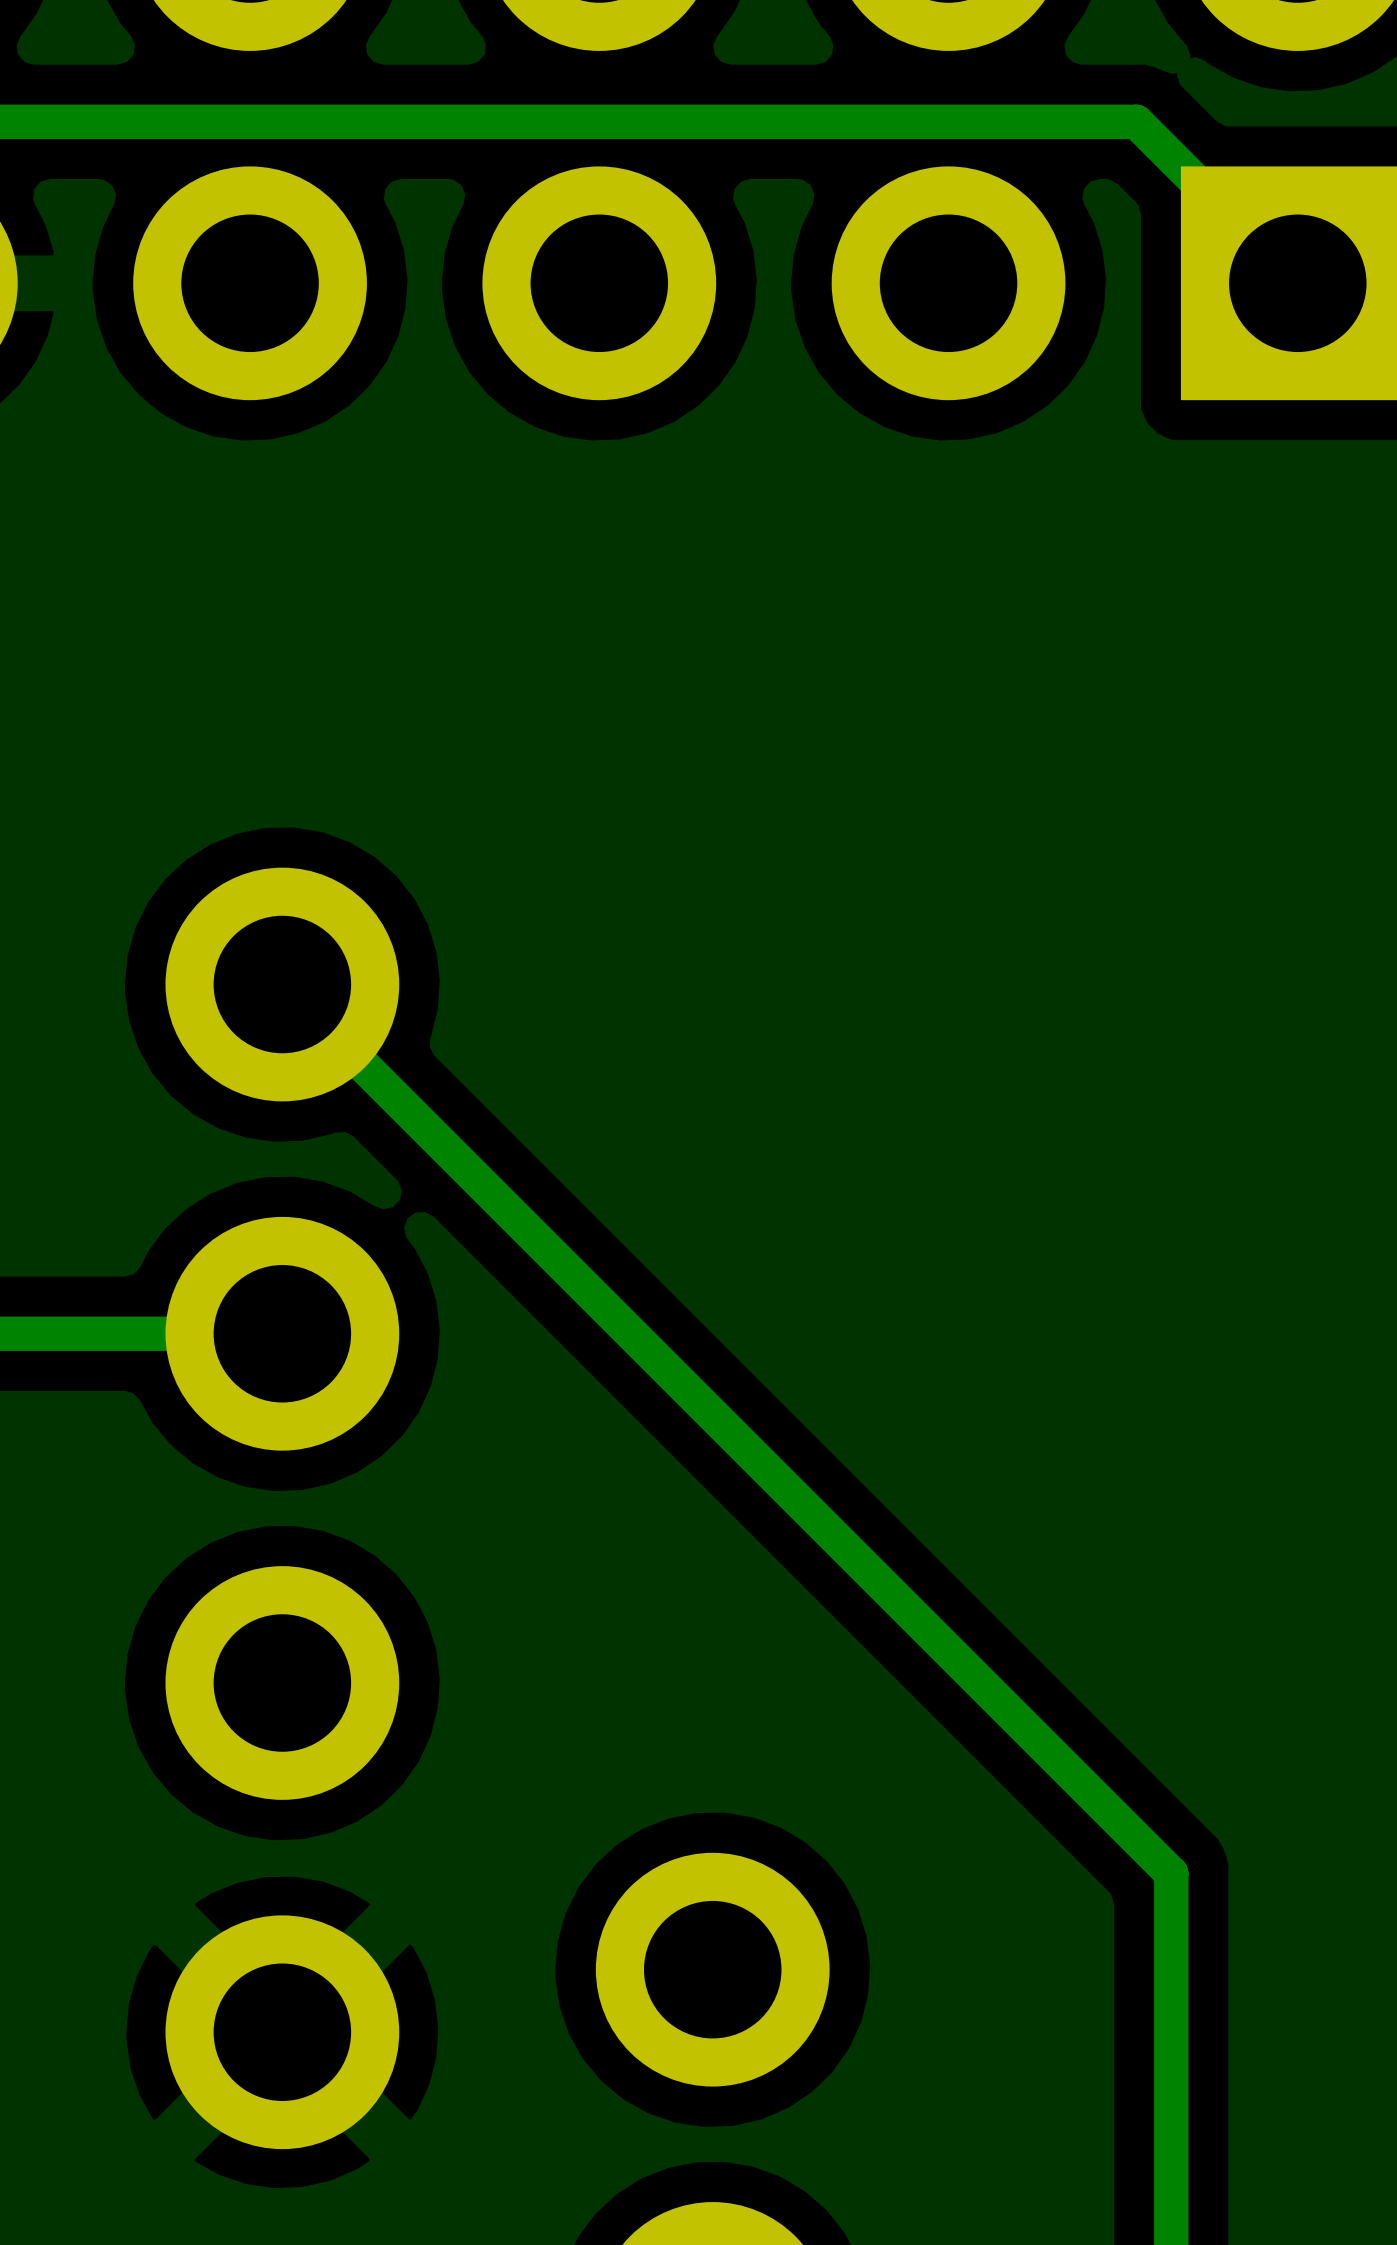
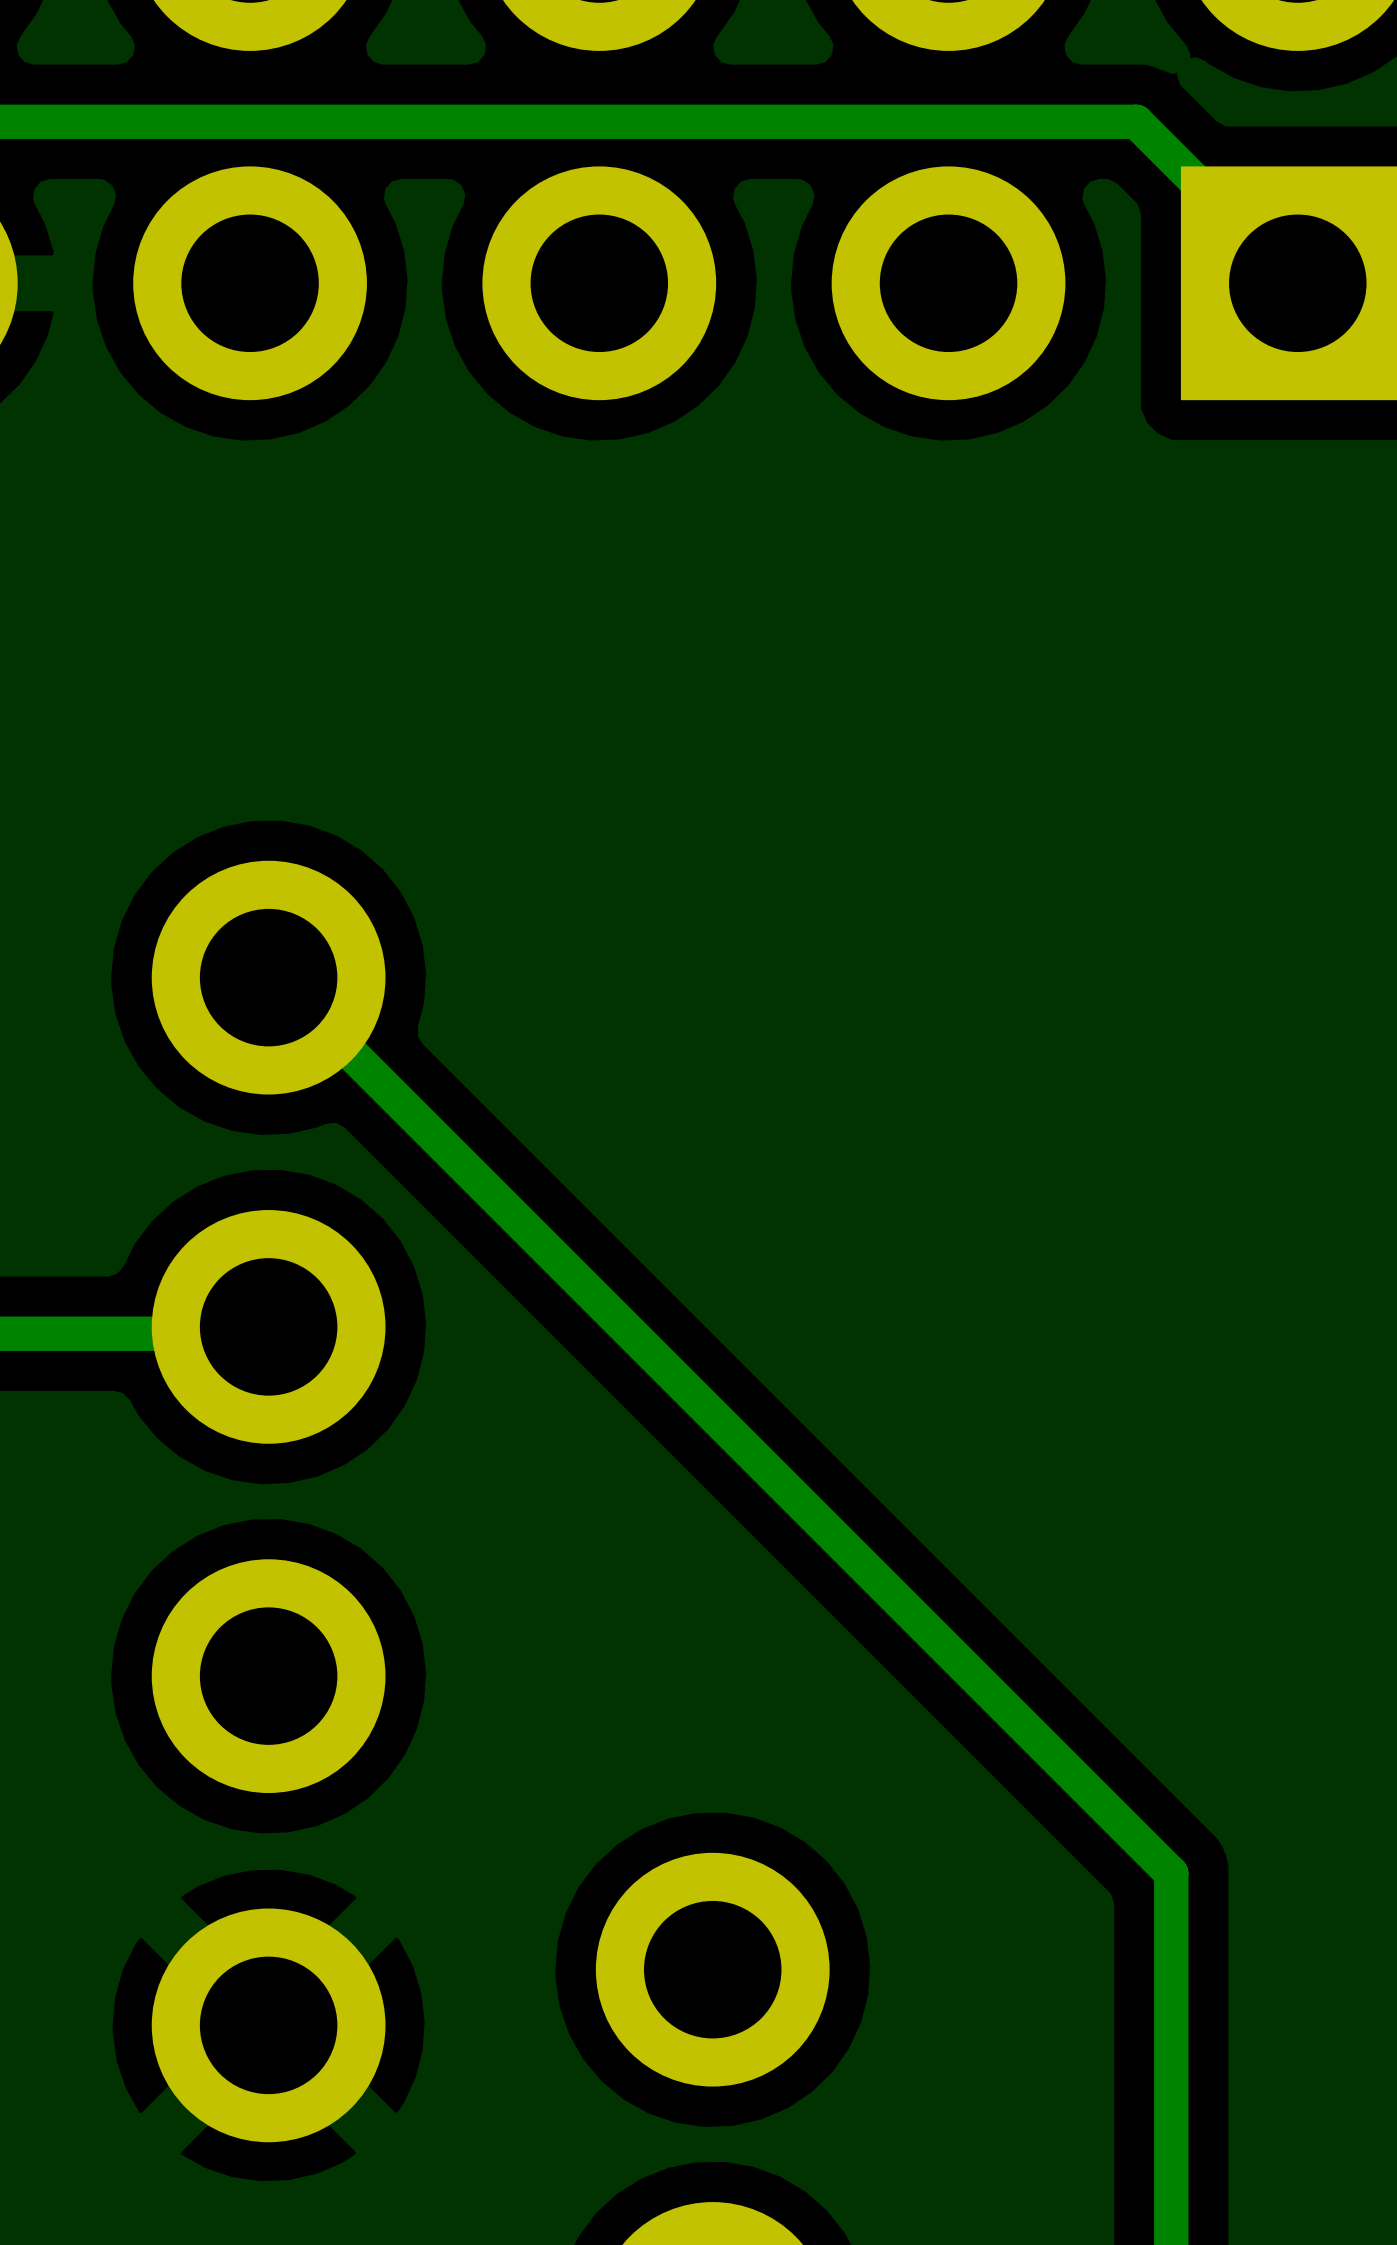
part position: (282, 1508) -> (268, 1501)

